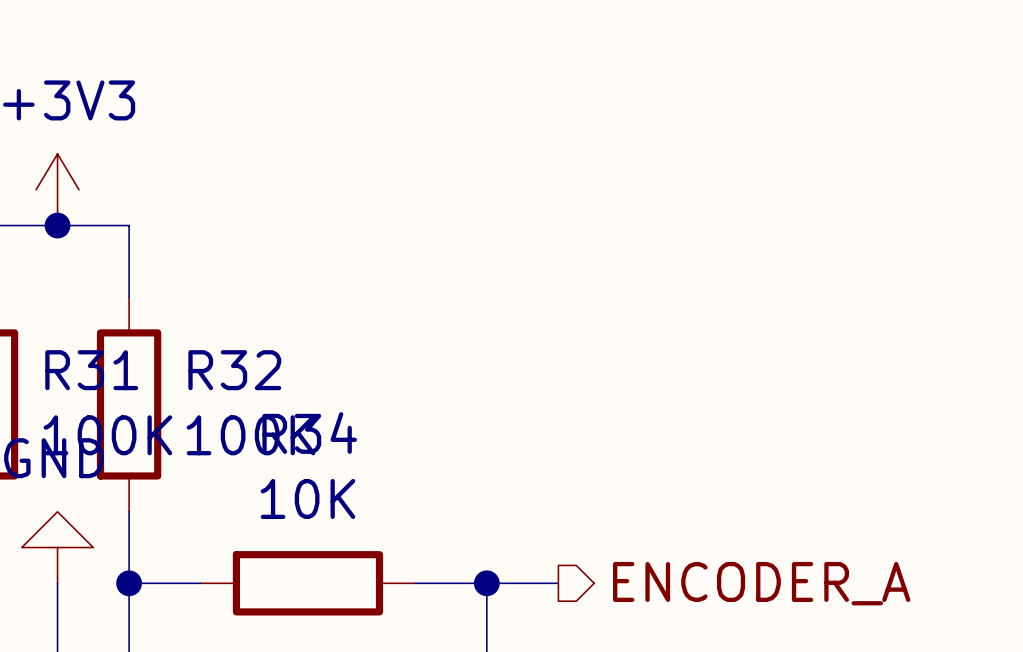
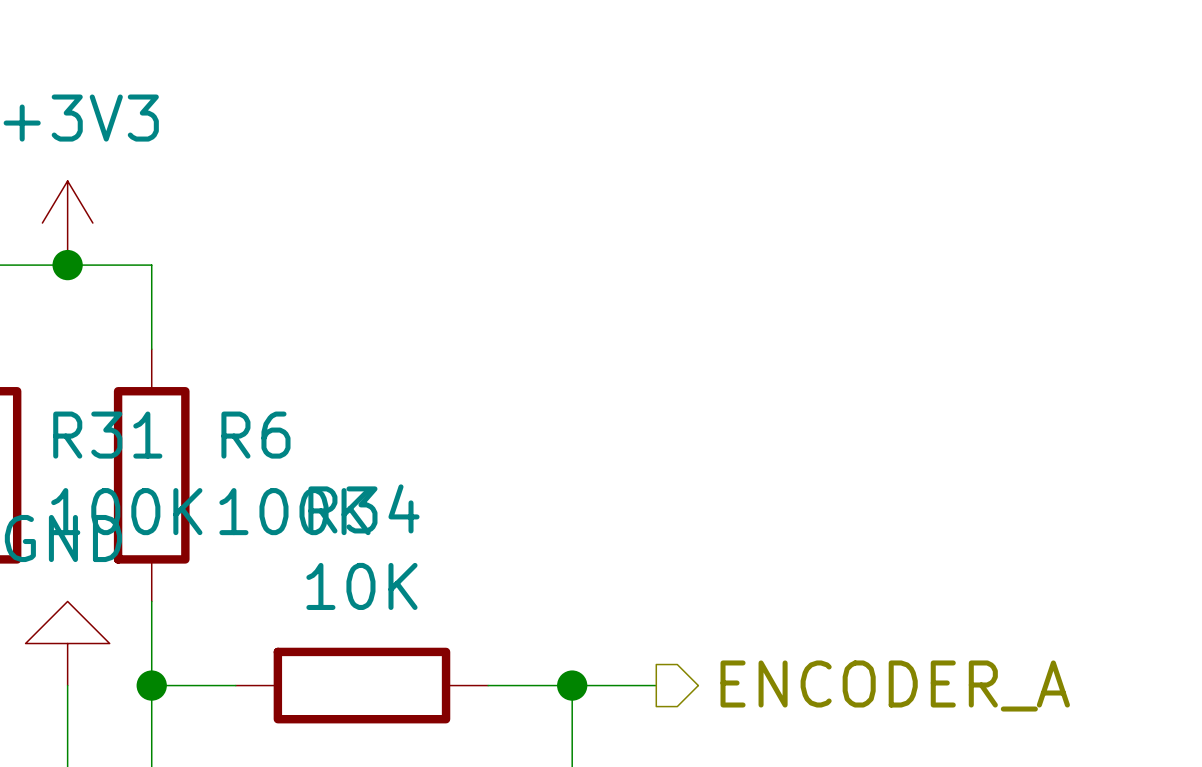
R32 name: R32 (234, 370) -> R6 (255, 435)

